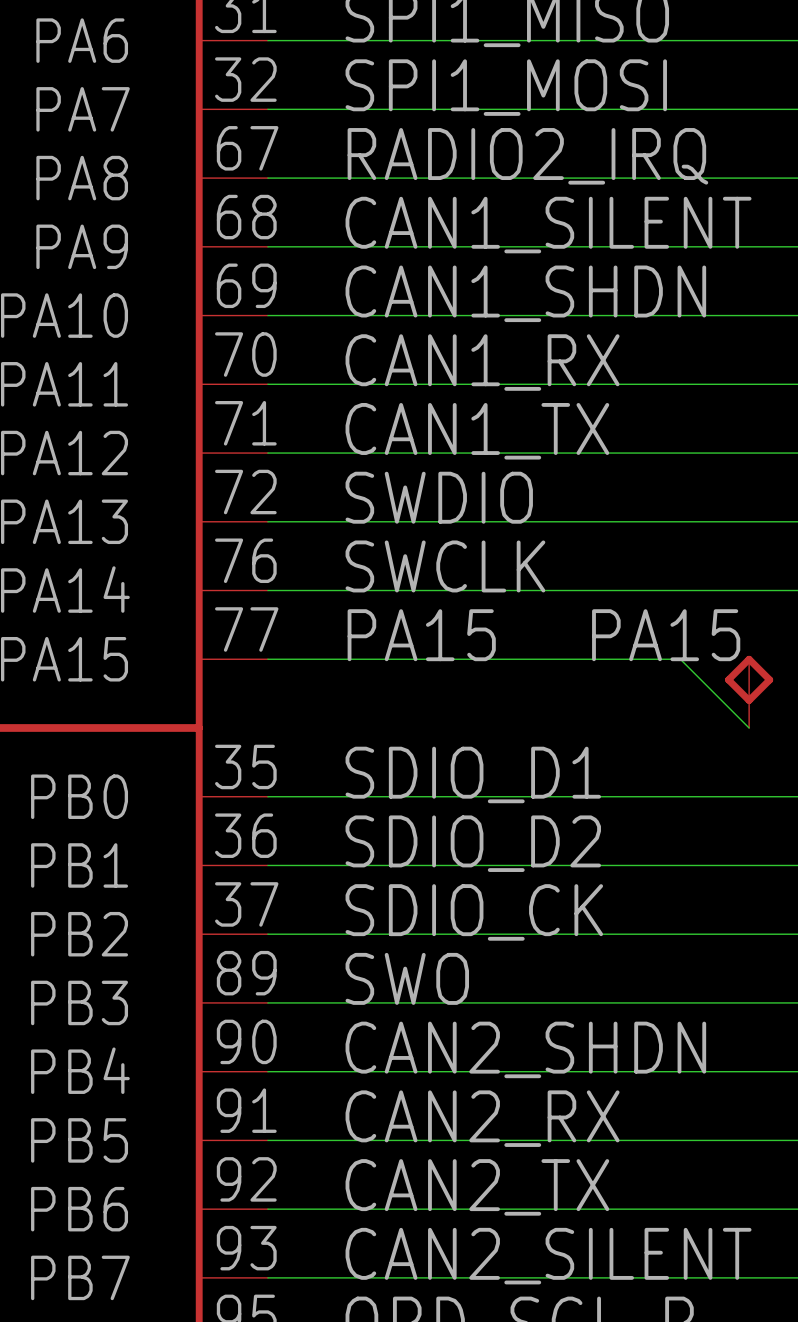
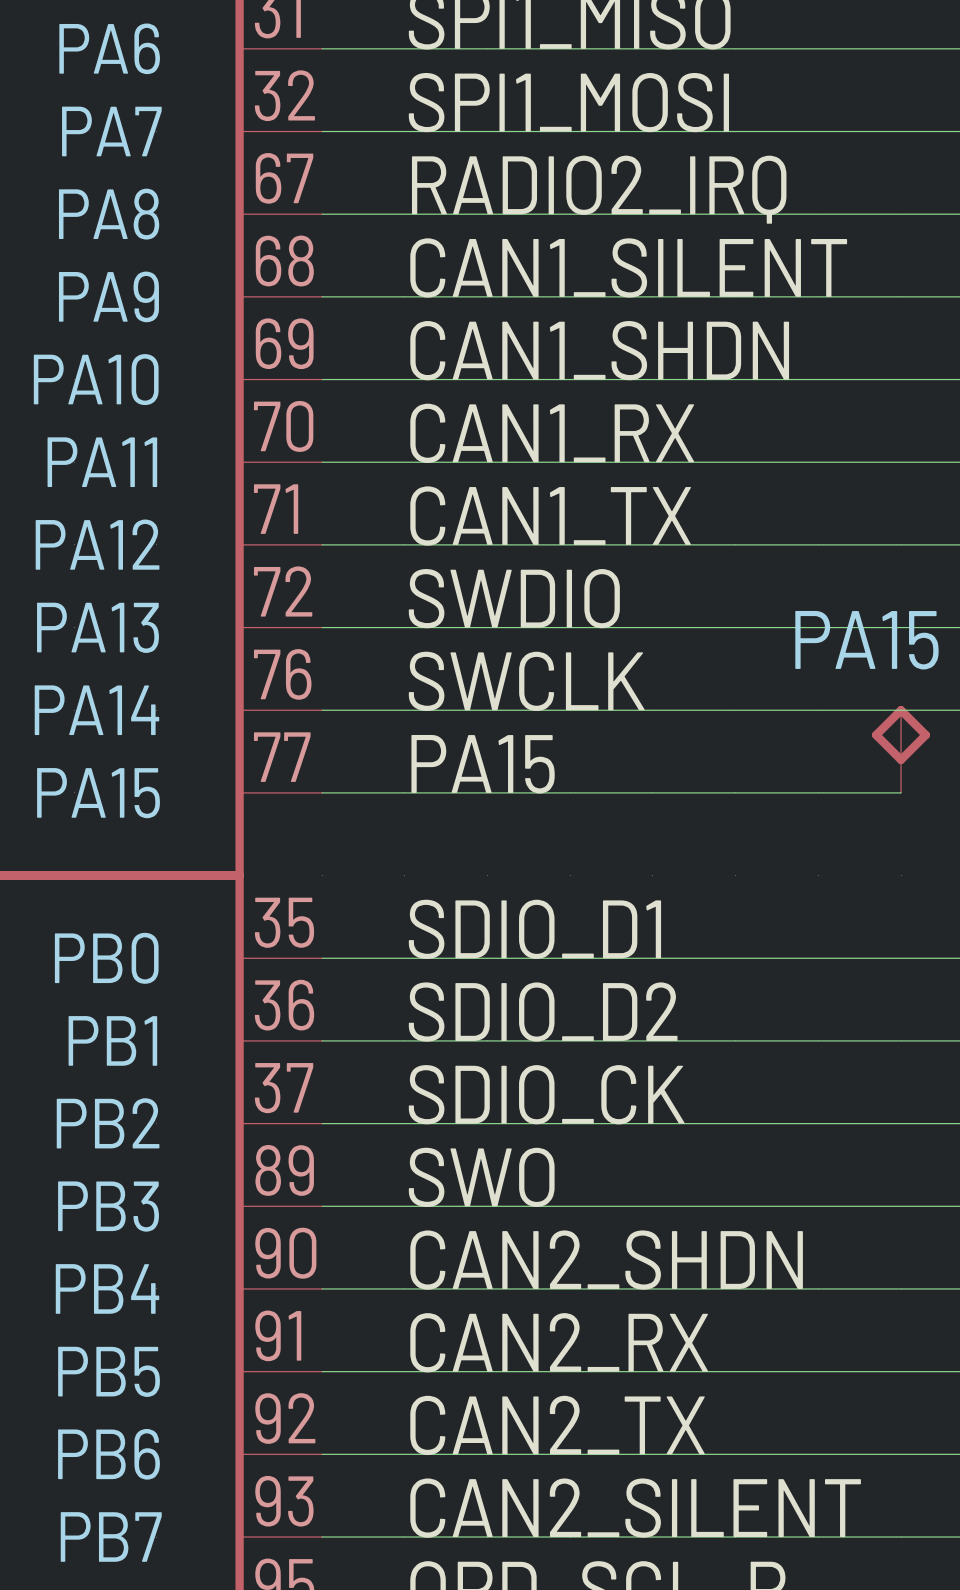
PA15 name position: PA15 (666, 635) -> PA15 (866, 640)
wire: (680, 659) (749, 727) -> (818, 792) (901, 792)
PA15 position: (749, 691) -> (901, 749)

